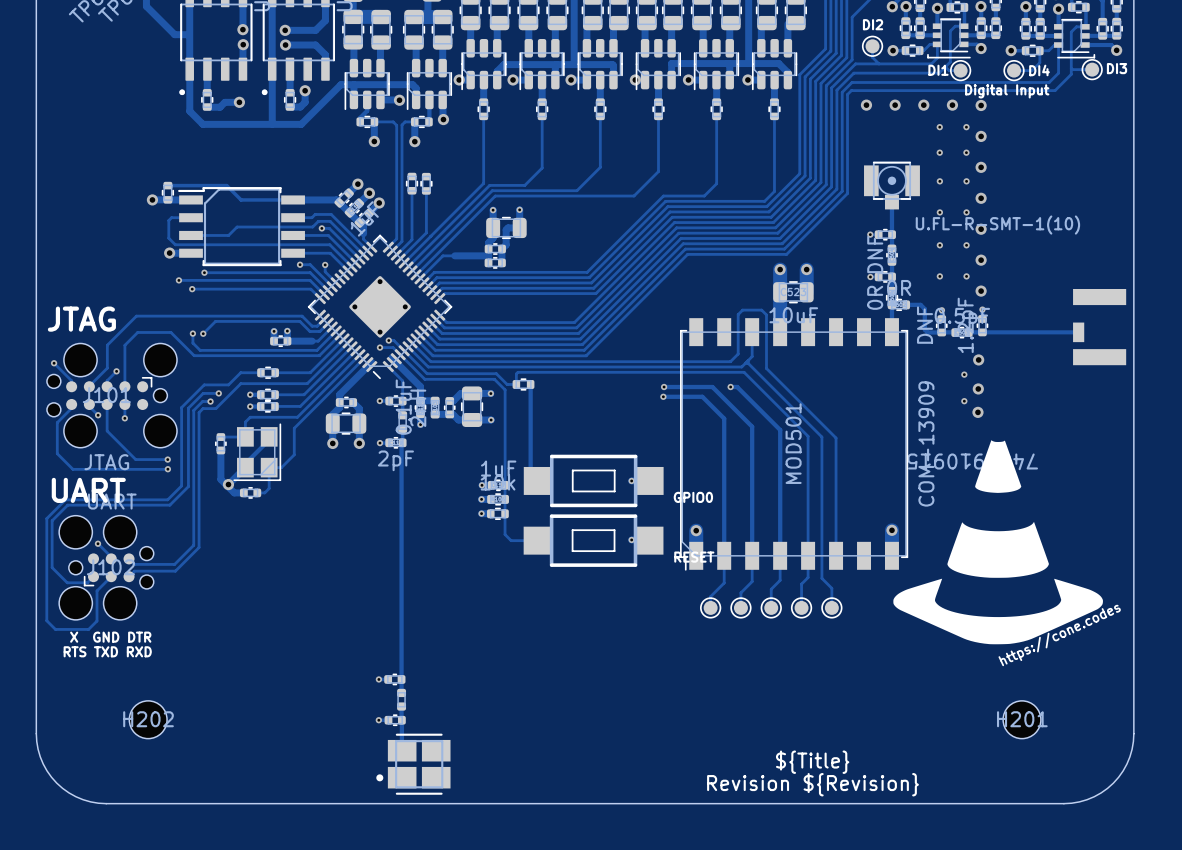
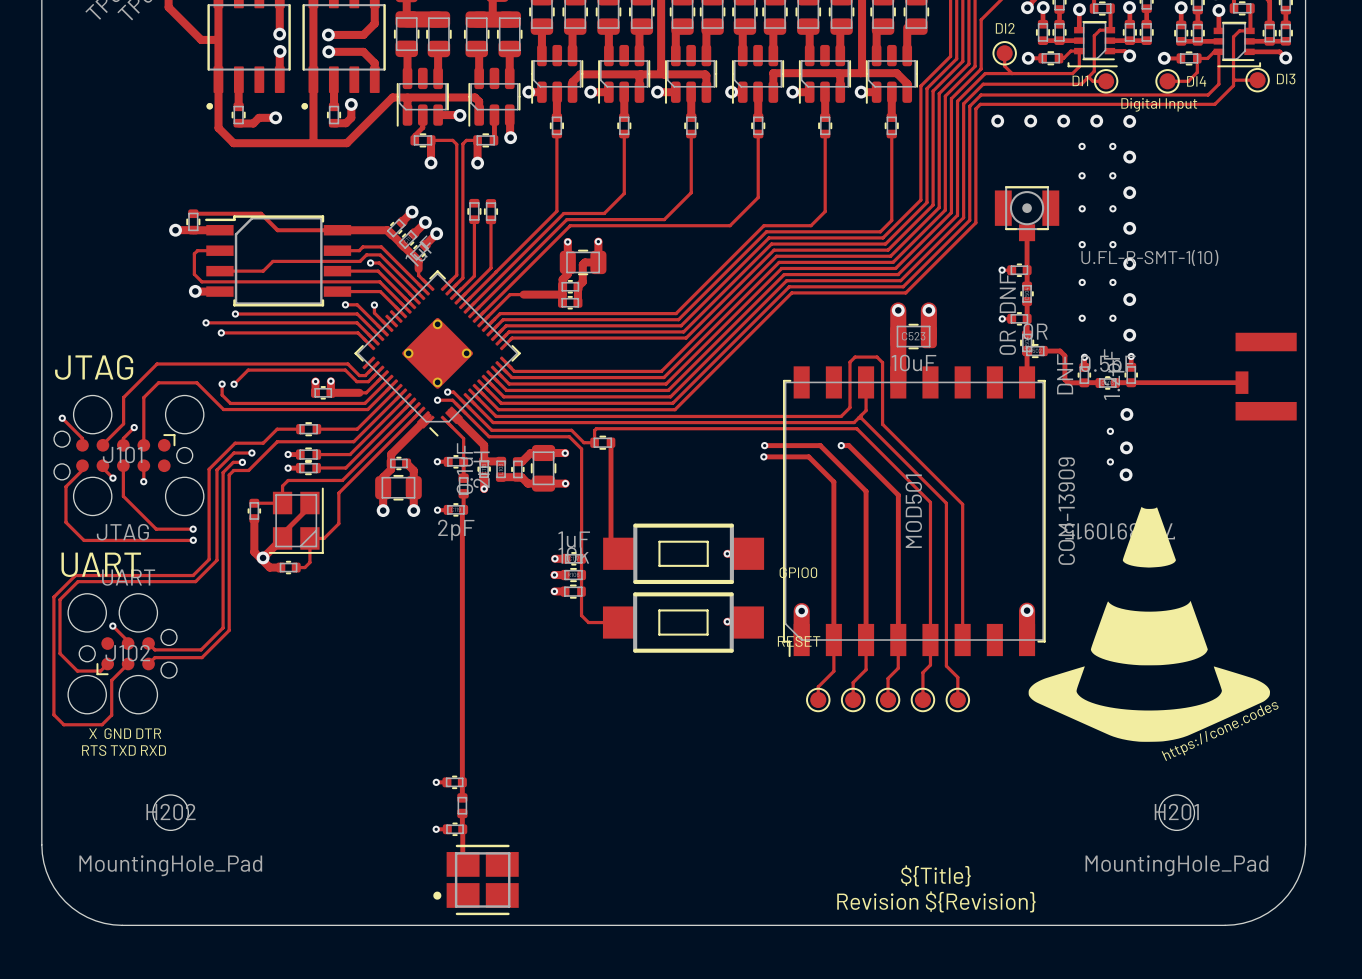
H202 footprint: [129, 700, 168, 739] -> [152, 794, 189, 831]
H201 footprint: [1003, 700, 1041, 739] -> [1159, 794, 1195, 831]
H202 value: none -> MountingHole_Pad (170, 865)
H201 value: none -> MountingHole_Pad (1176, 865)

